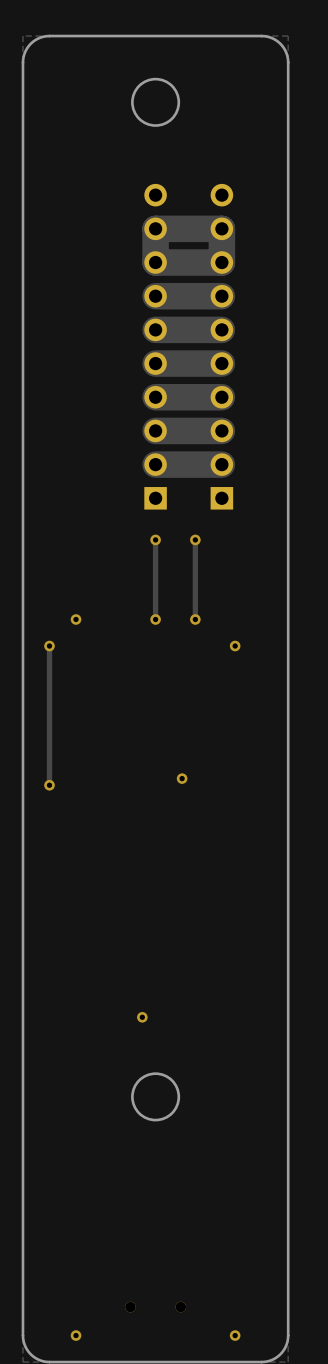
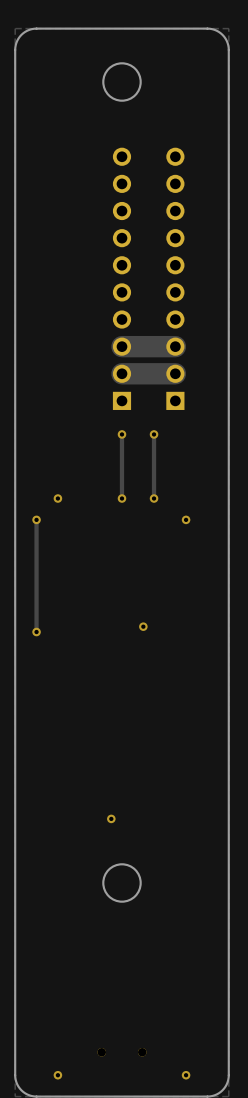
track: (221, 228) (155, 228) (155, 262) (221, 262) (221, 228) -> none
track: (221, 296) (155, 296) -> none
track: (221, 329) (155, 329) -> none
track: (221, 363) (155, 363) -> none
track: (221, 397) (155, 397) -> none

